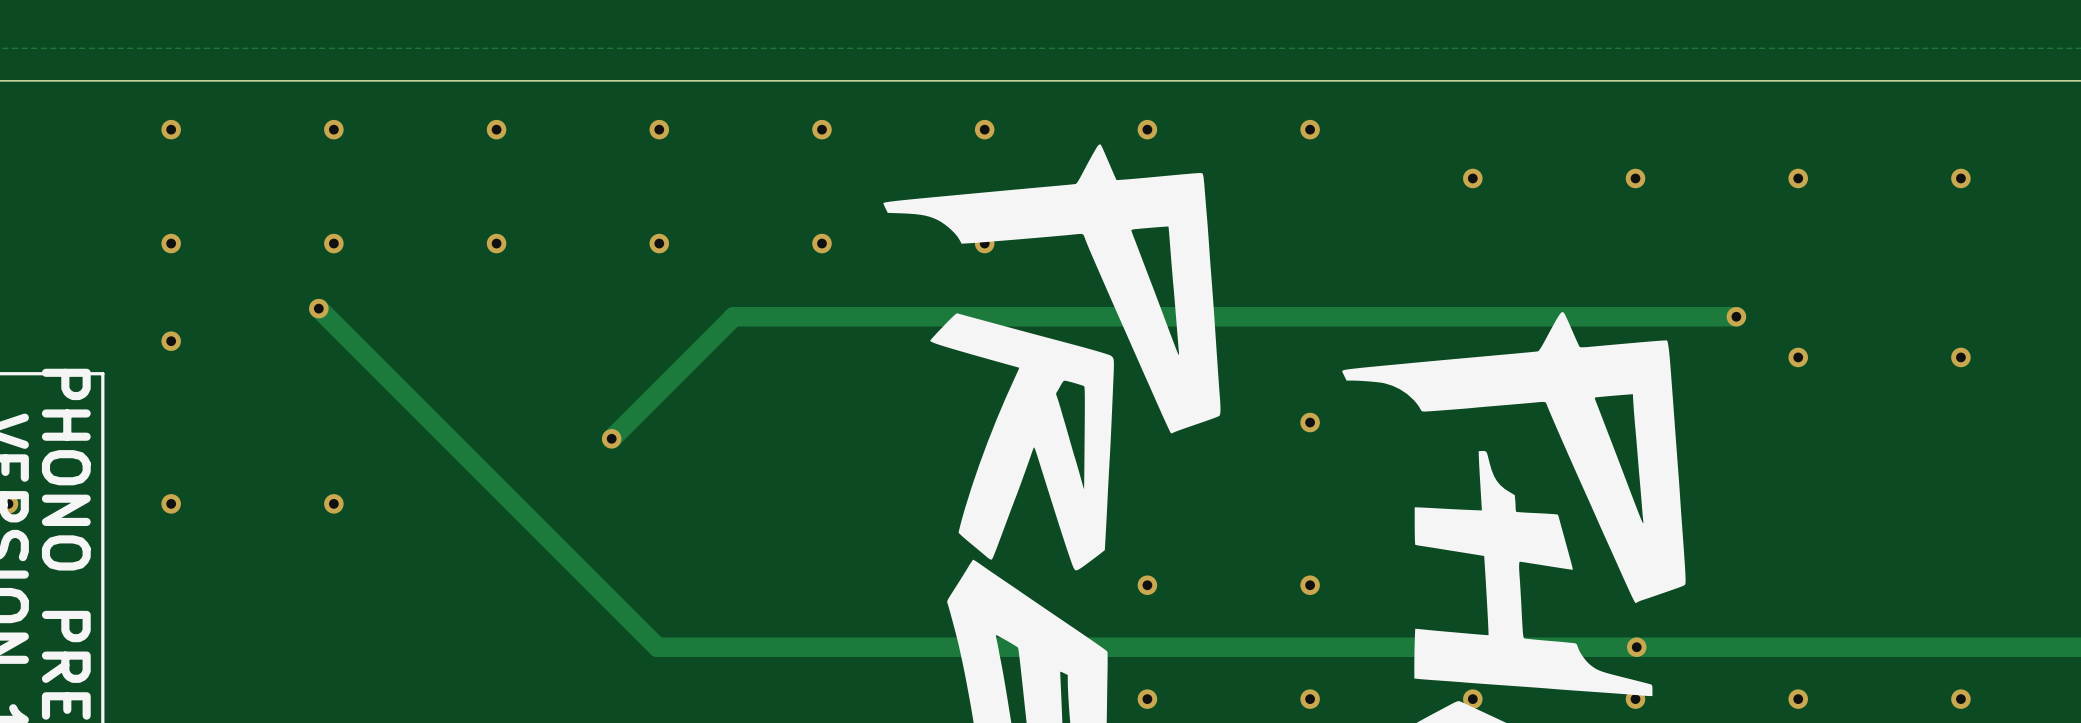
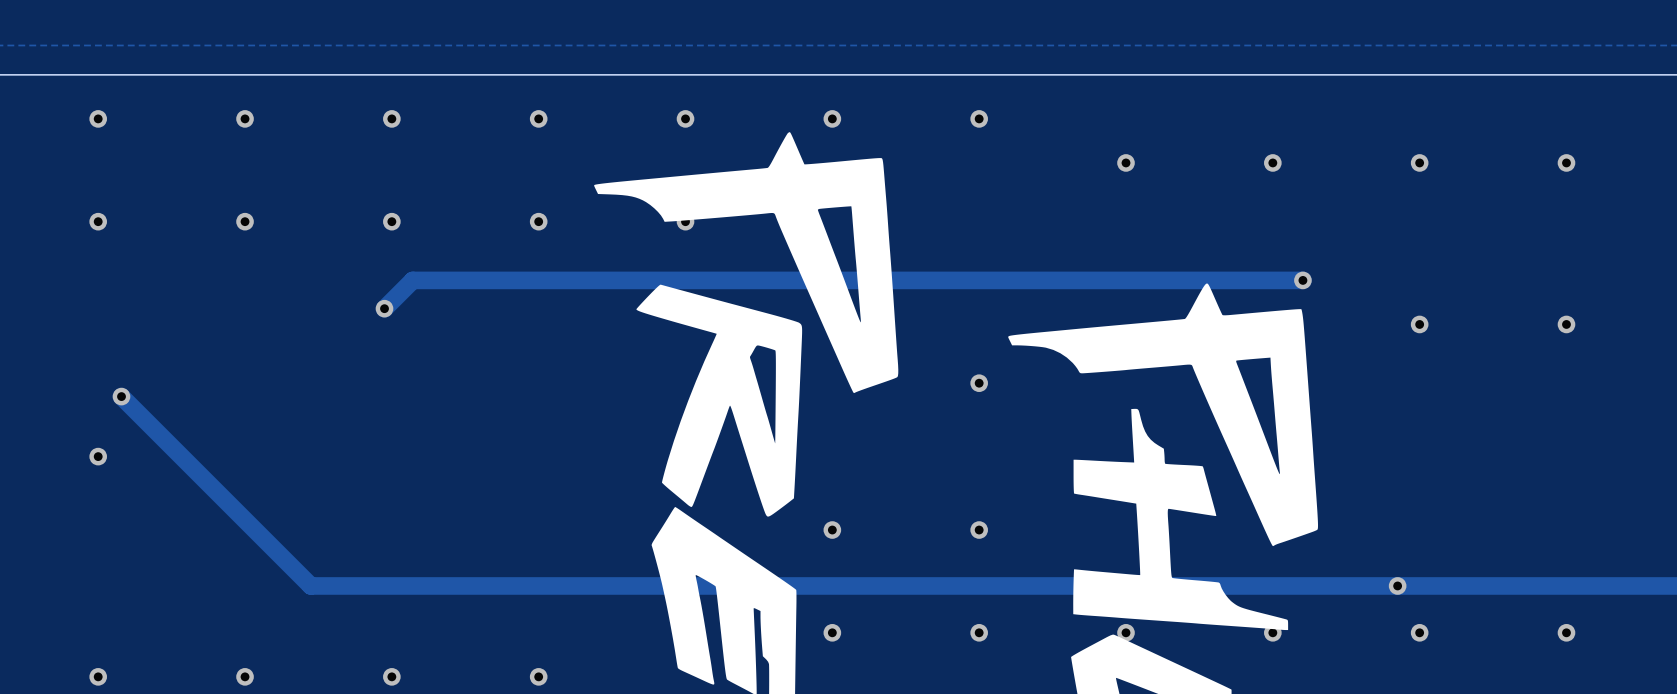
track: (318, 308) (657, 647) -> (121, 396) (310, 585) (390, 585)
via: (318, 308) -> none
track: none -> (1302, 280) (412, 280) (384, 308)
track: (1736, 316) (733, 316) (611, 438) -> none
via position: (1736, 316) -> (1302, 280)
via: none -> (121, 396)
via position: (611, 438) -> (384, 308)
via position: (1636, 647) -> (1397, 585)

